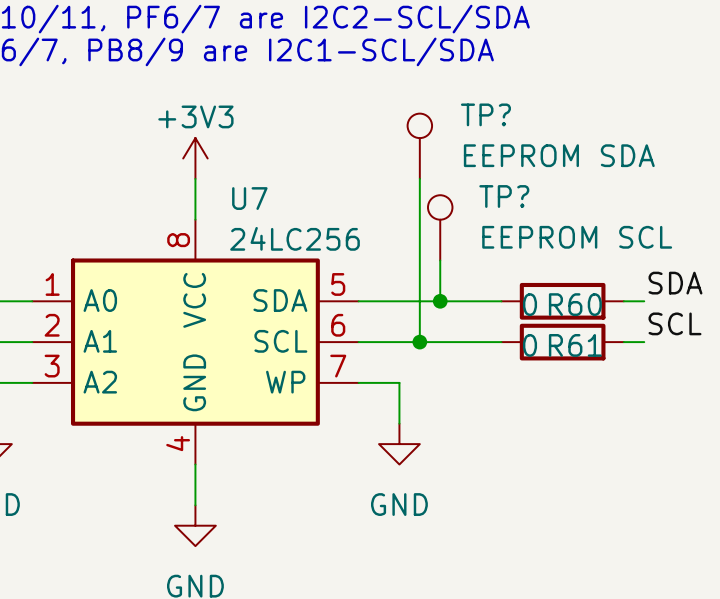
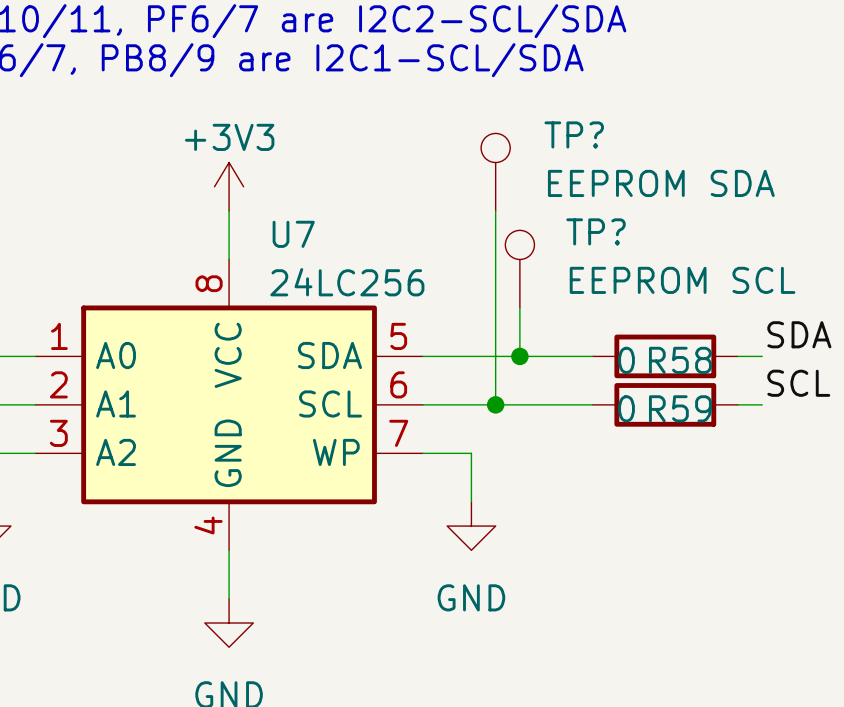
R60 name: R60 (575, 304) -> R58 (680, 360)
R61 name: R61 (575, 345) -> R59 (680, 408)

